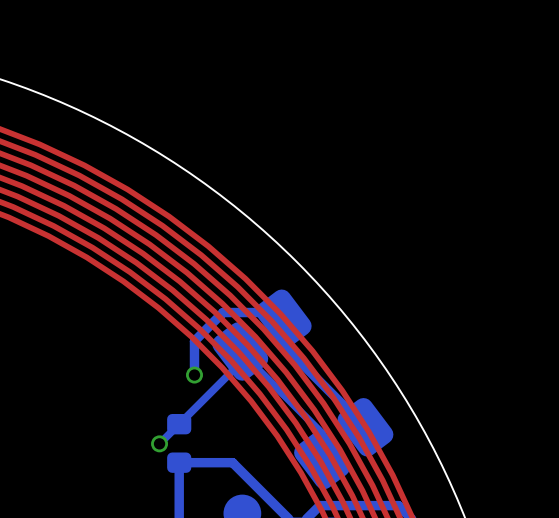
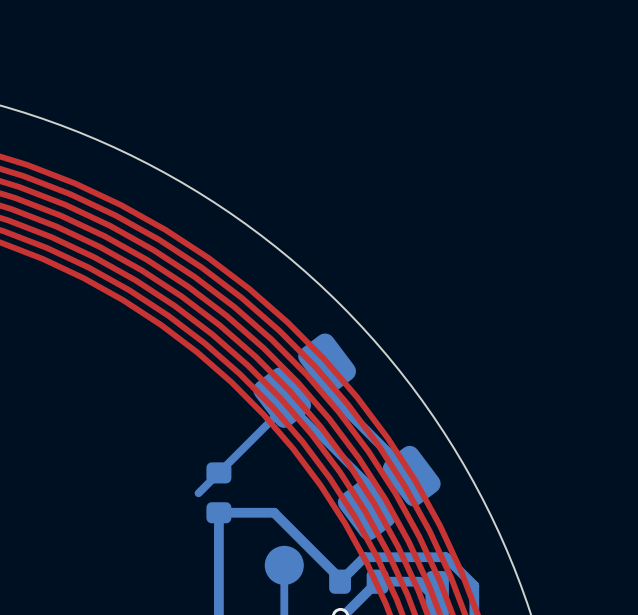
bottom track: (283, 318) (277, 312) (223, 312) (194, 341) (194, 375) -> none
via: (194, 375) -> none
via: (159, 443) -> none

